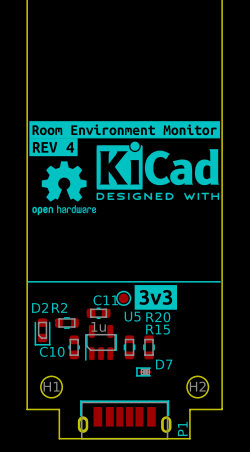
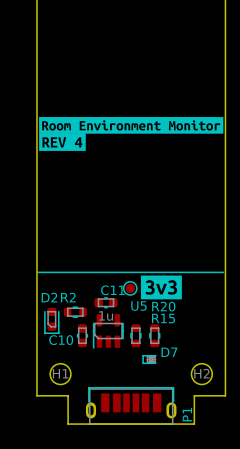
drawing: [32, 141, 220, 216] -> none

